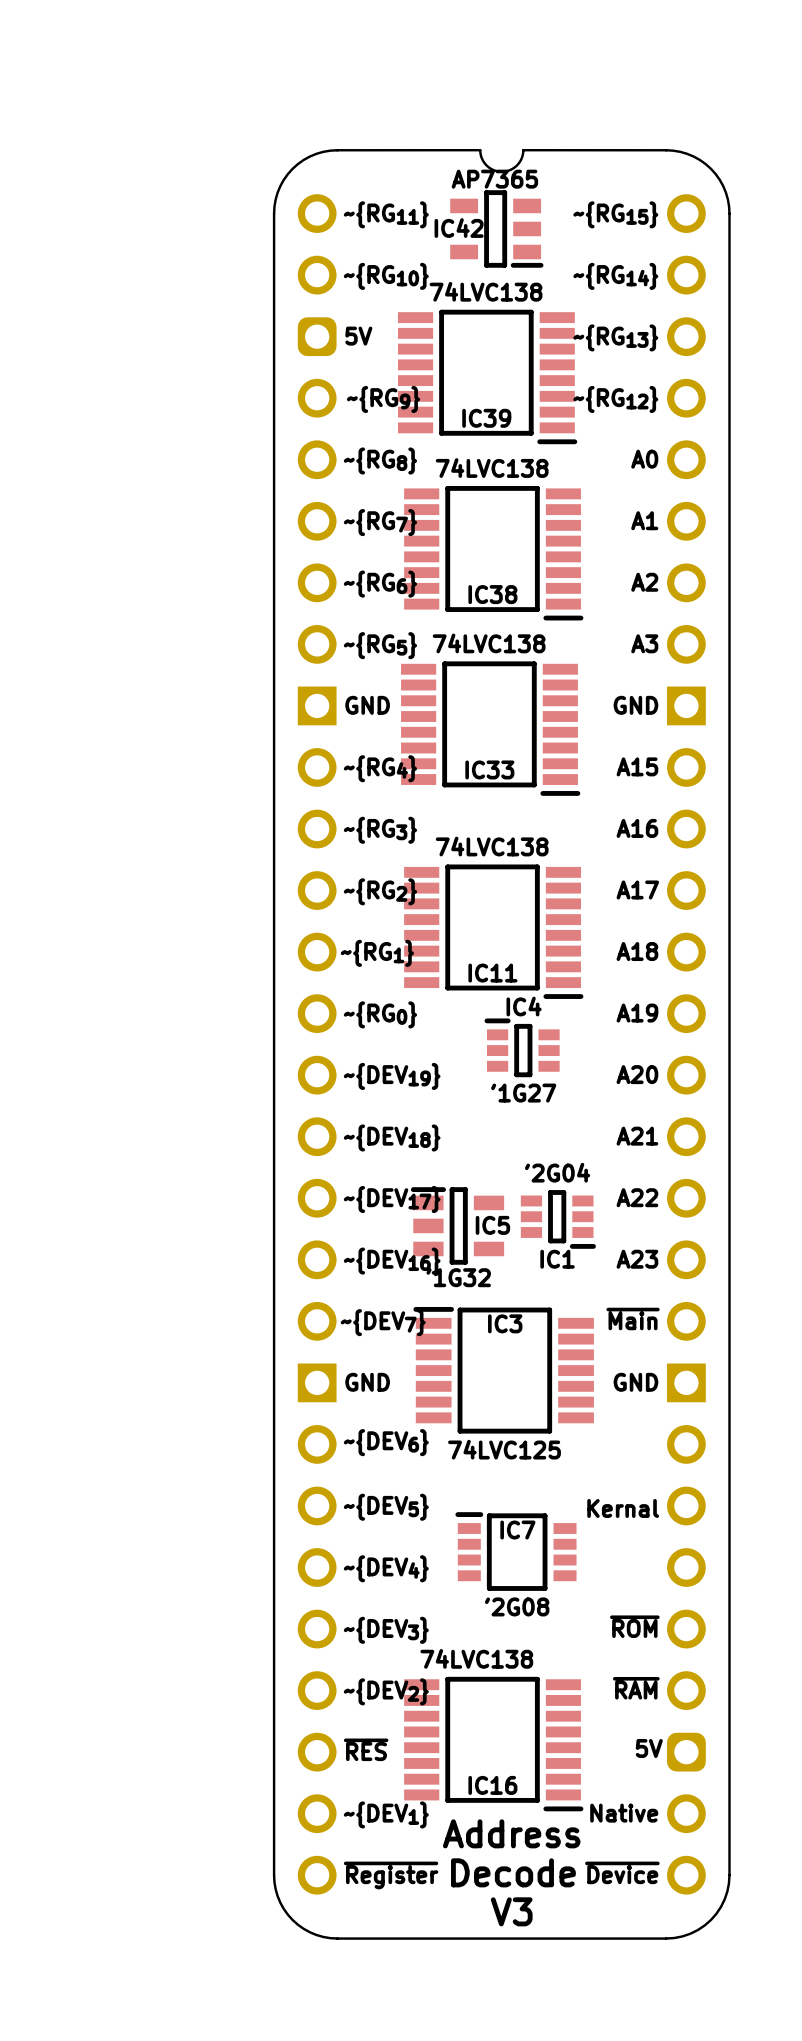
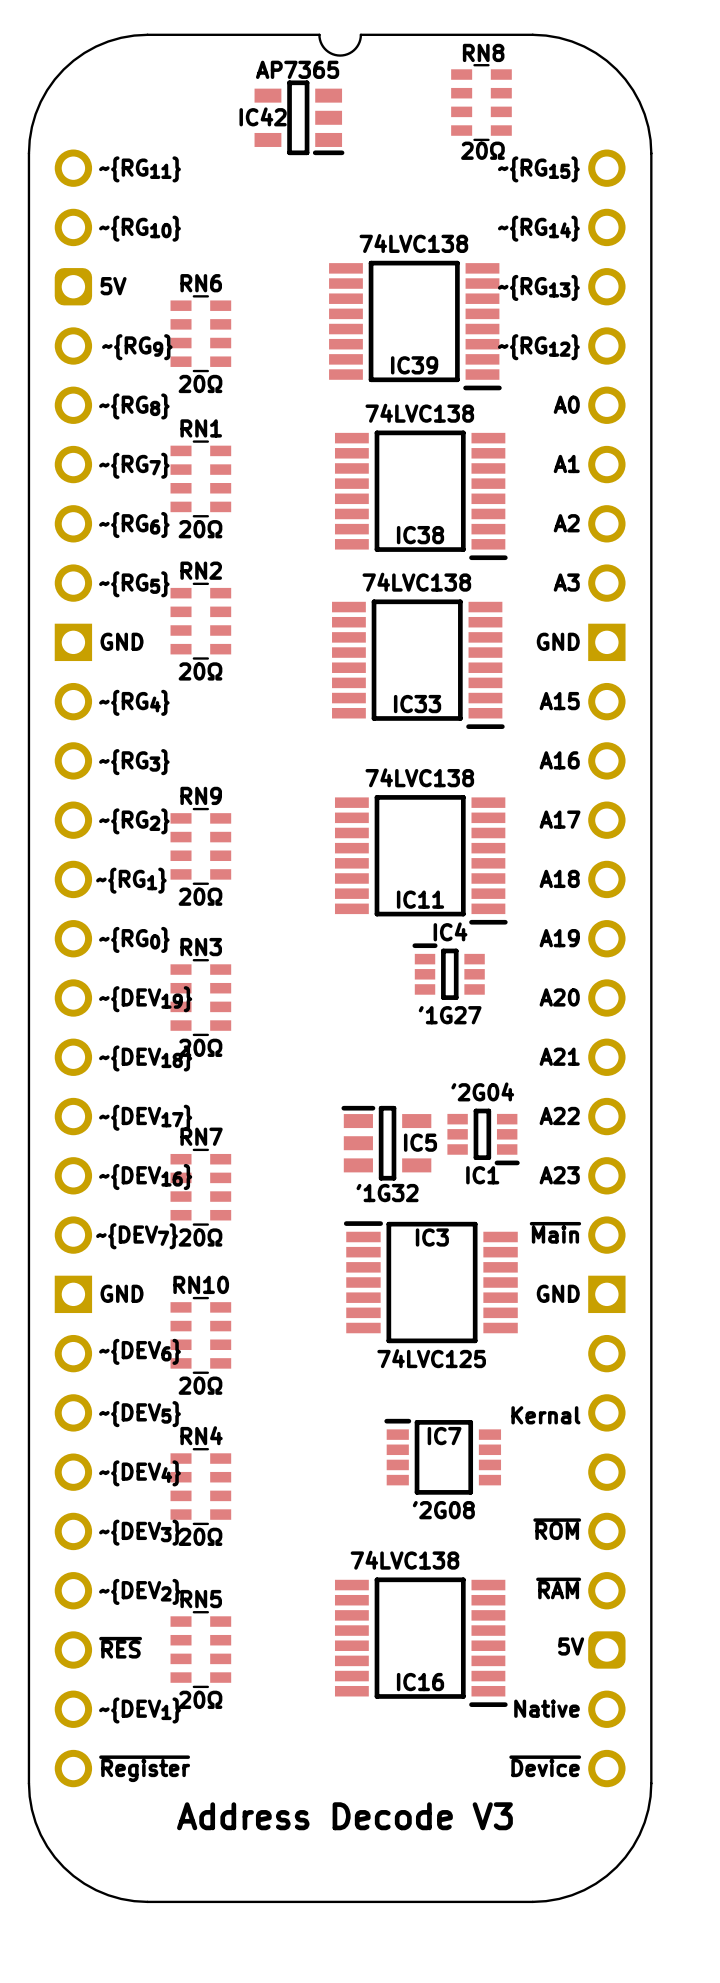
RN8: none -> (481, 102)
text position: ~{RG11} (386, 214) -> ~{RG11} (139, 169)
IC42 position: (496, 228) -> (299, 117)
text position: ~{RG10} (386, 276) -> ~{RG10} (139, 228)
text position: 5V (358, 336) -> 5V (113, 286)
RN6: none -> (200, 333)
text position: ~{RG9} (383, 399) -> ~{RG9} (137, 347)
text position: ~{RG8} (380, 461) -> ~{RG8} (134, 406)
text position: ~{RG7} (380, 522) -> ~{RG7} (134, 465)
RN1: none -> (200, 478)
text position: ~{RG6} (380, 584) -> ~{RG6} (134, 525)
text position: ~{RG5} (380, 645) -> ~{RG5} (134, 584)
RN2: none -> (200, 621)
text position: GND (367, 705) -> GND (122, 641)
text position: ~{RG4} (380, 768) -> ~{RG4} (134, 702)
text position: ~{RG3} (380, 830) -> ~{RG3} (134, 762)
text position: ~{RG2} (380, 891) -> ~{RG2} (134, 821)
RN9: none -> (200, 846)
text position: ~{RG1} (377, 953) -> ~{RG1} (131, 880)
text position: ~{RG0} (380, 1014) -> ~{RG0} (134, 939)
part: none -> (340, 968)
part: (501, 1044) -> none
RN3: none -> (200, 997)
text position: ~{DEV19} (392, 1076) -> ~{DEV19} (145, 999)
text position: ~{DEV18} (392, 1137) -> ~{DEV18} (145, 1058)
text position: ~{DEV17} (392, 1199) -> ~{DEV17} (145, 1117)
text position: ~{DEV16} (392, 1261) -> ~{DEV16} (145, 1177)
RN7: none -> (200, 1187)
text position: ~{DEV7} (383, 1322) -> ~{DEV7} (137, 1236)
text position: GND (367, 1382) -> GND (122, 1293)
RN10: none -> (200, 1335)
text position: ~{DEV6} (386, 1442) -> ~{DEV6} (139, 1351)
text position: ~{DEV5} (386, 1507) -> ~{DEV5} (139, 1414)
text position: ~{DEV4} (386, 1568) -> ~{DEV4} (139, 1473)
RN4: none -> (200, 1486)
text position: ~{DEV3} (386, 1630) -> ~{DEV3} (139, 1532)
text position: ~{DEV2} (386, 1691) -> ~{DEV2} (139, 1591)
text position: ~{RES} (366, 1749) -> ~{RES} (120, 1647)
RN5: none -> (200, 1649)
text position: ~{DEV1} (386, 1814) -> ~{DEV1} (139, 1710)
text: Address (511, 1833) -> none
text: Decode (513, 1872) -> none
text position: ~{Register} (391, 1875) -> ~{Register} (144, 1768)
text: V3 (511, 1911) -> none
text: none -> Address Decode V3 (344, 1816)

